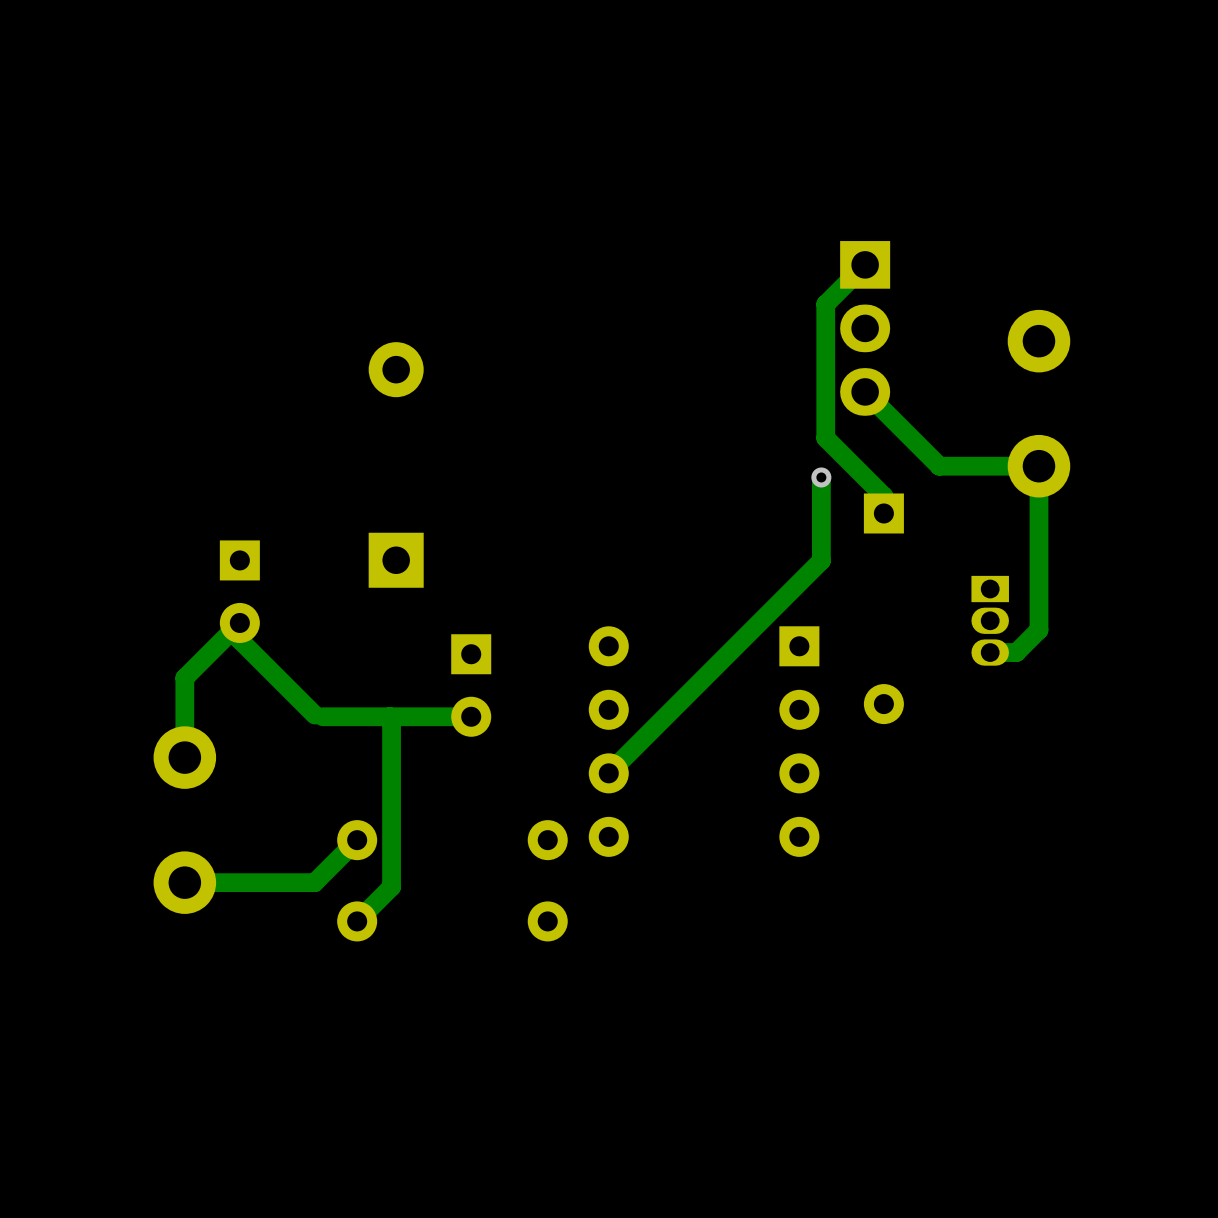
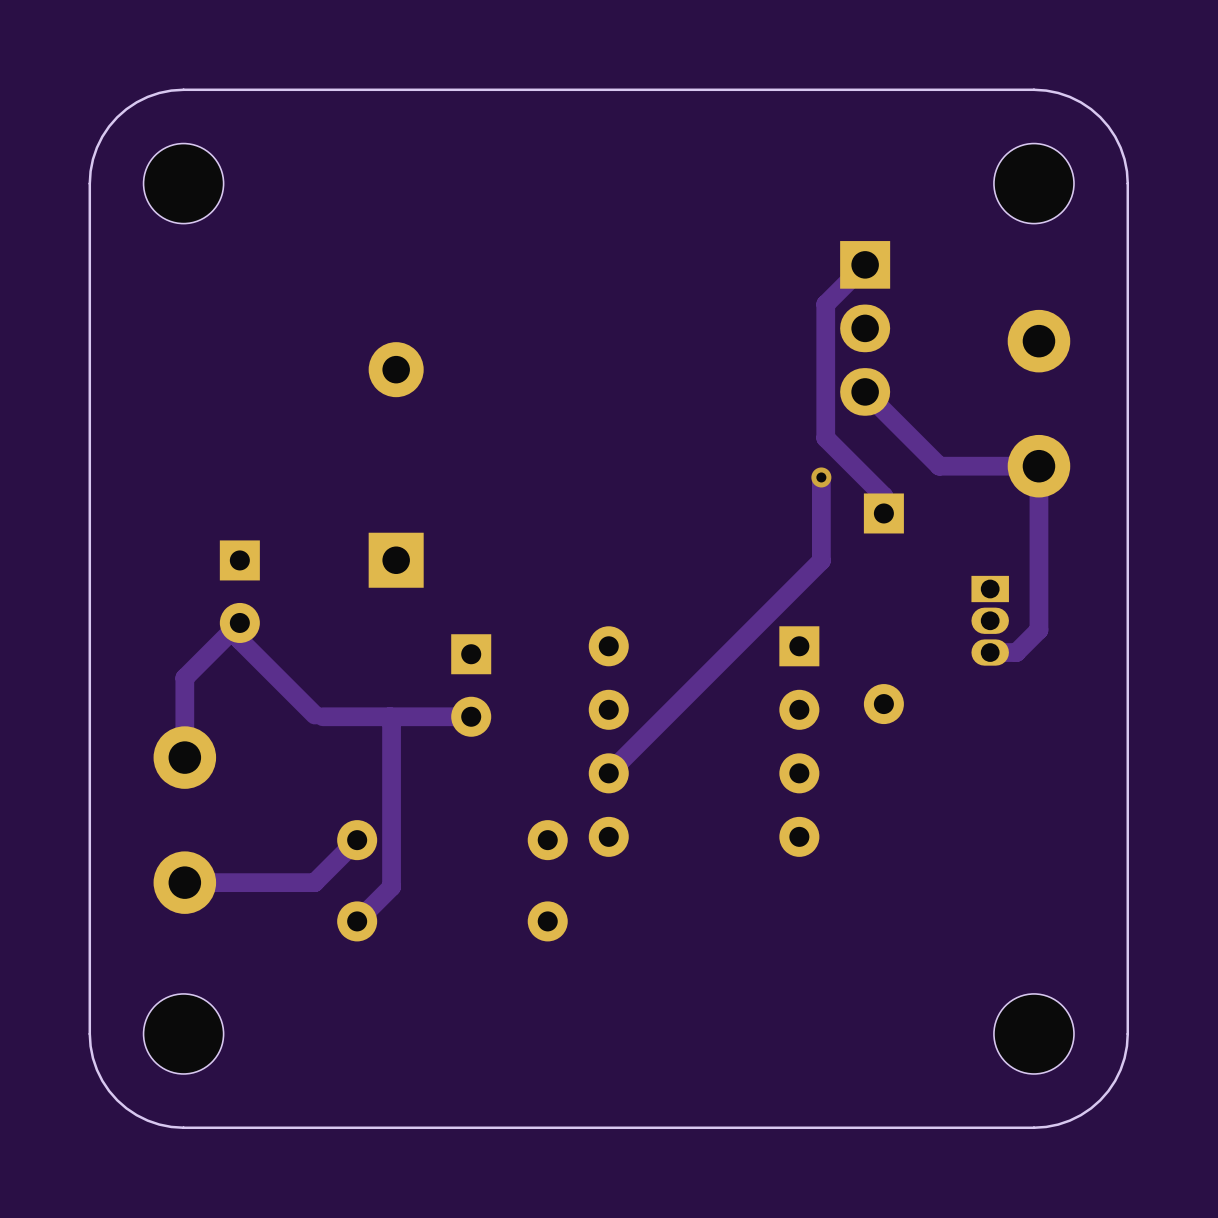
board edge: none -> (1033, 89) (183, 89) (171, 90) (147, 96) (126, 109) (117, 117) (109, 126) (96, 147) (92, 159) (89, 183) (89, 1033) (92, 1058) (96, 1069) (109, 1091) (117, 1100) (126, 1108) (147, 1120) (171, 1126) (183, 1127) (1033, 1127) (1046, 1126) (1069, 1120) (1091, 1108) (1100, 1100) (1108, 1091) (1120, 1069) (1124, 1058) (1127, 1033) (1126, 171) (1120, 147) (1108, 126) (1100, 117) (1091, 109) (1069, 96) (1046, 90) (1033, 89)
part: none -> (183, 183)
part: none -> (1033, 183)
part: none -> (183, 1033)
part: none -> (1033, 1033)

